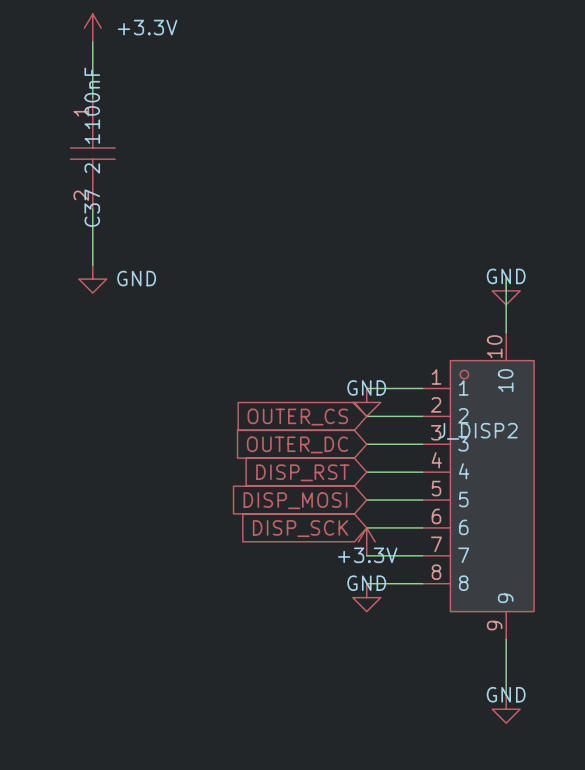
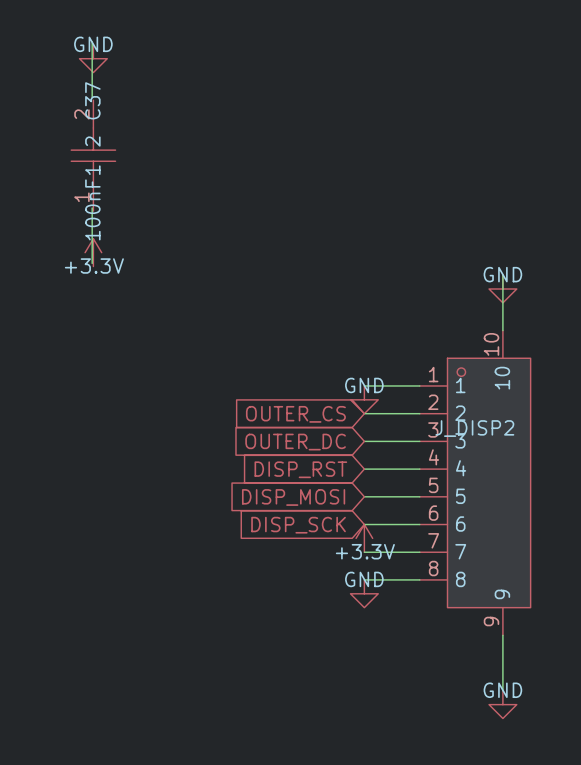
power symbol text position: +3.3V (147, 27) -> +3.3V (94, 266)
power symbol position: +3.3V (92, 28) -> +3.3V (93, 252)
C37 rotation: 0° (92, 153) -> 180° (93, 155)
power symbol text position: GND (136, 278) -> GND (93, 44)
power symbol position: GND (92, 279) -> GND (93, 58)

